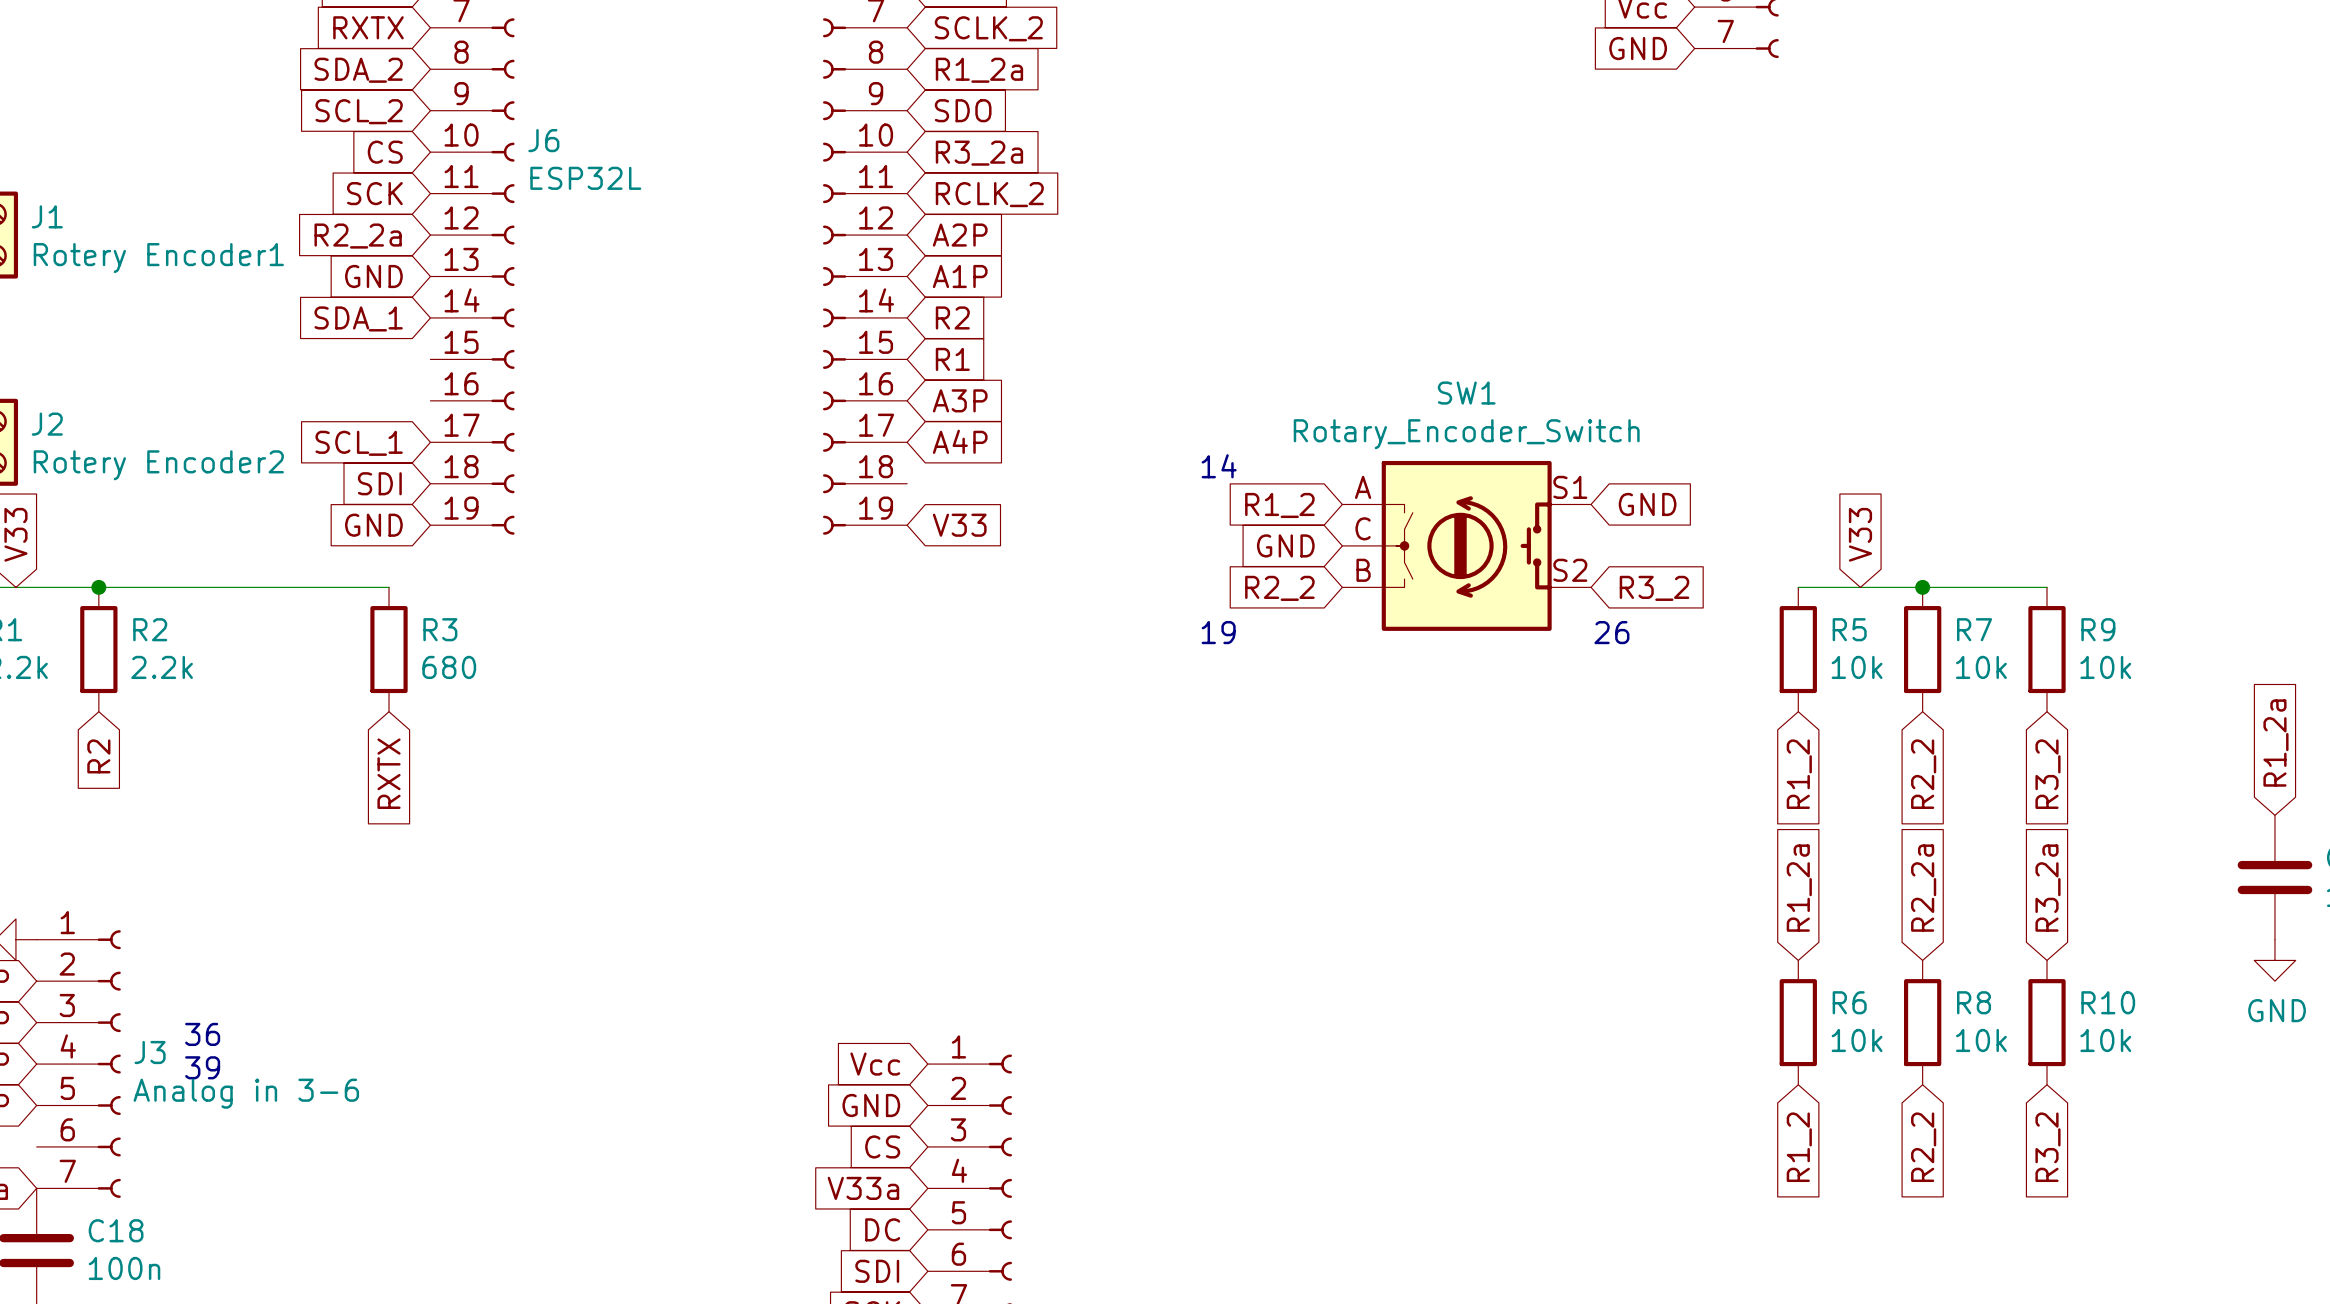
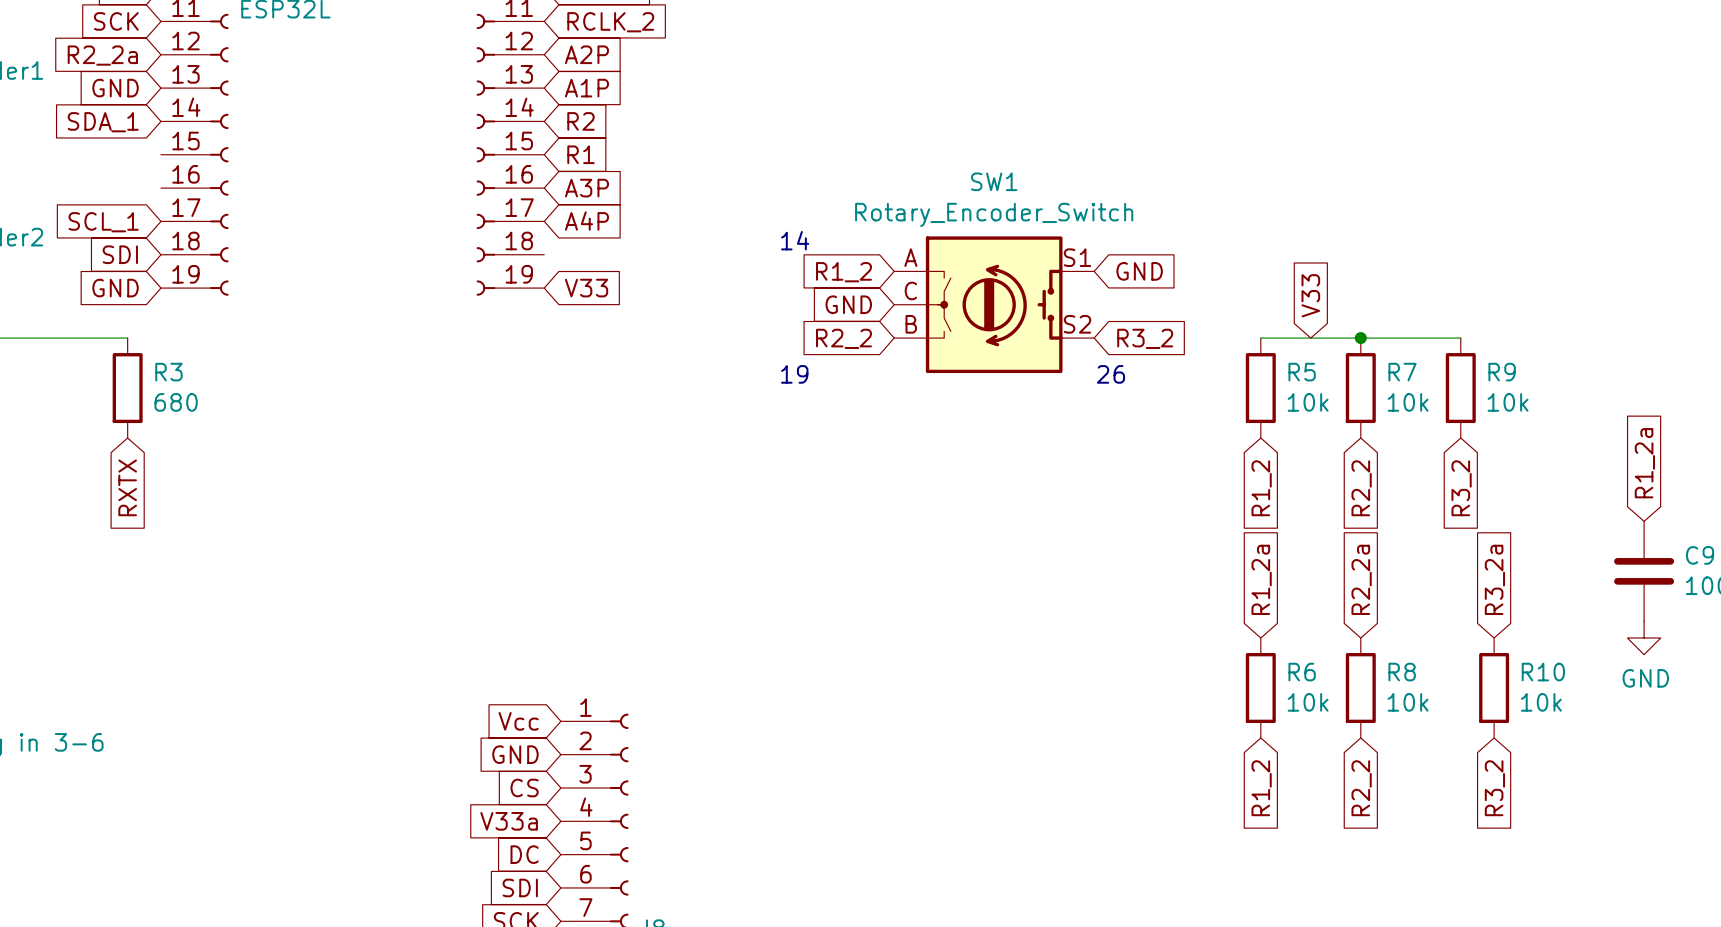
global label position: R3_2a (2047, 888) -> R3_2a (1494, 579)
R10 position: (2047, 1022) -> (1494, 688)
global label position: R3_2 (2047, 1147) -> R3_2 (1494, 788)

